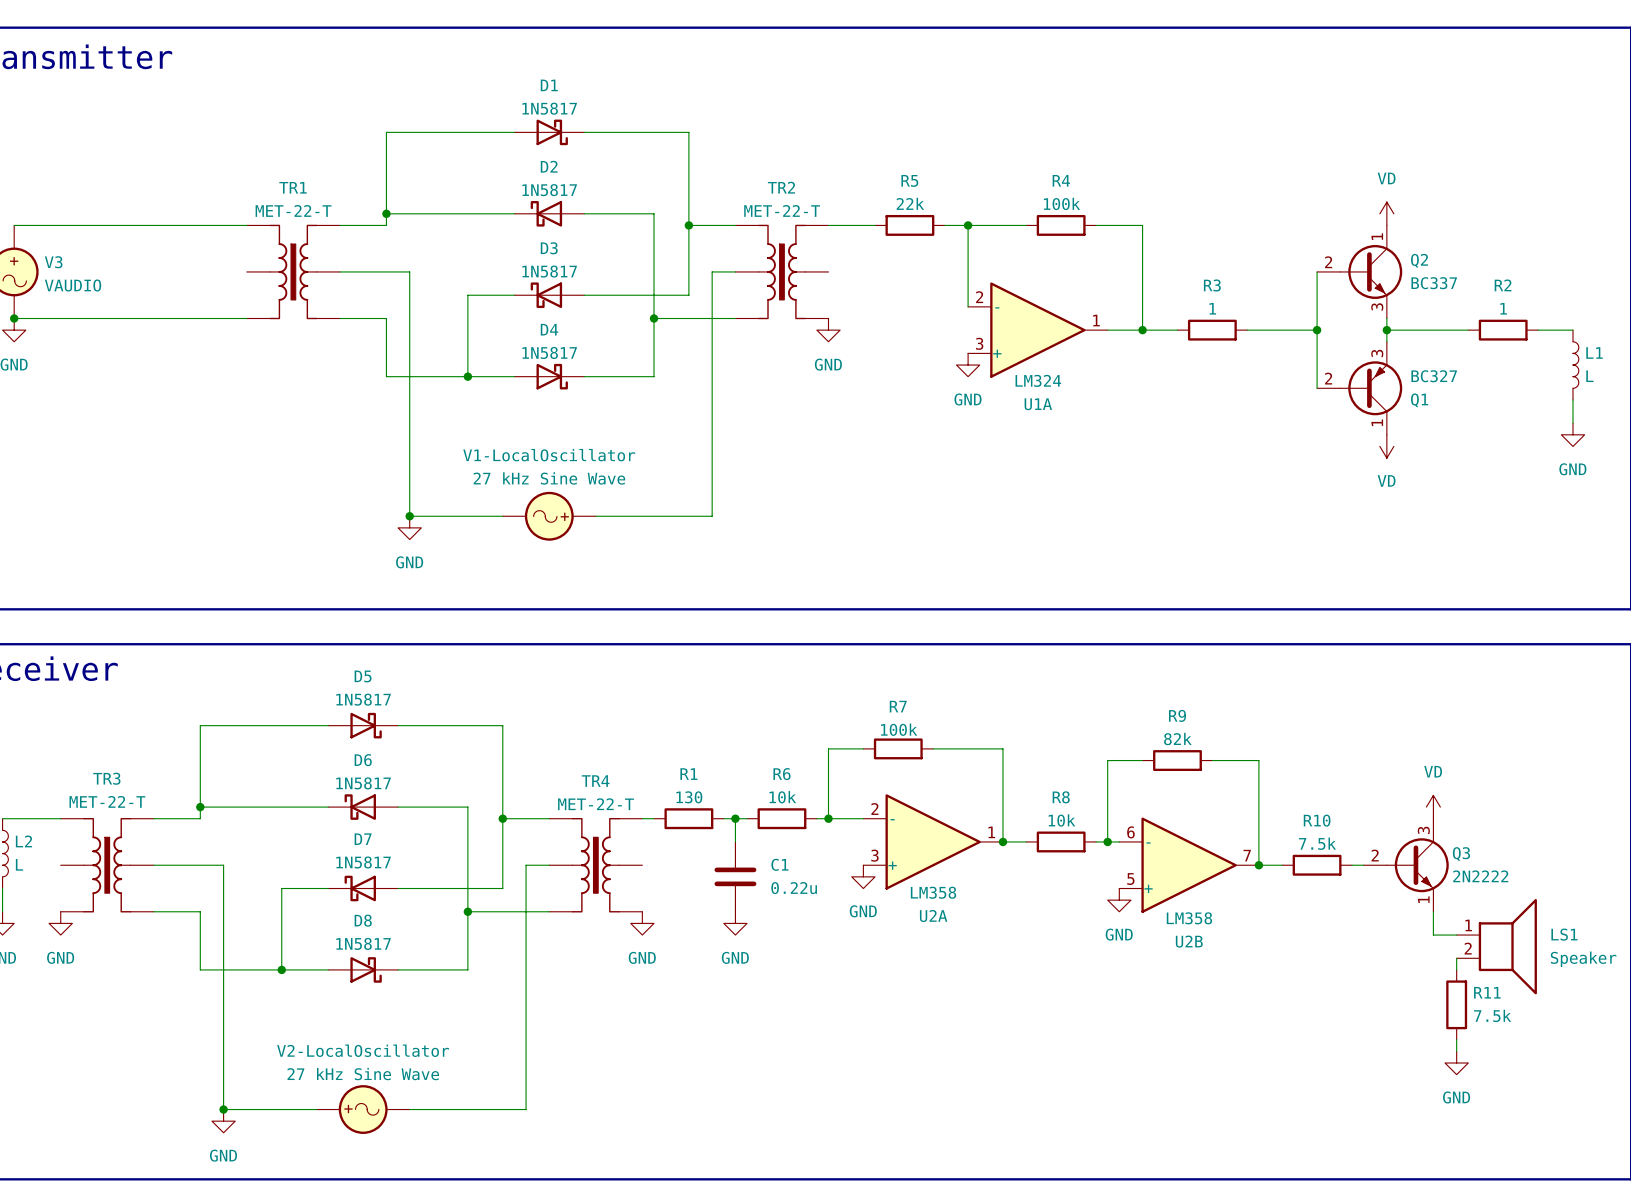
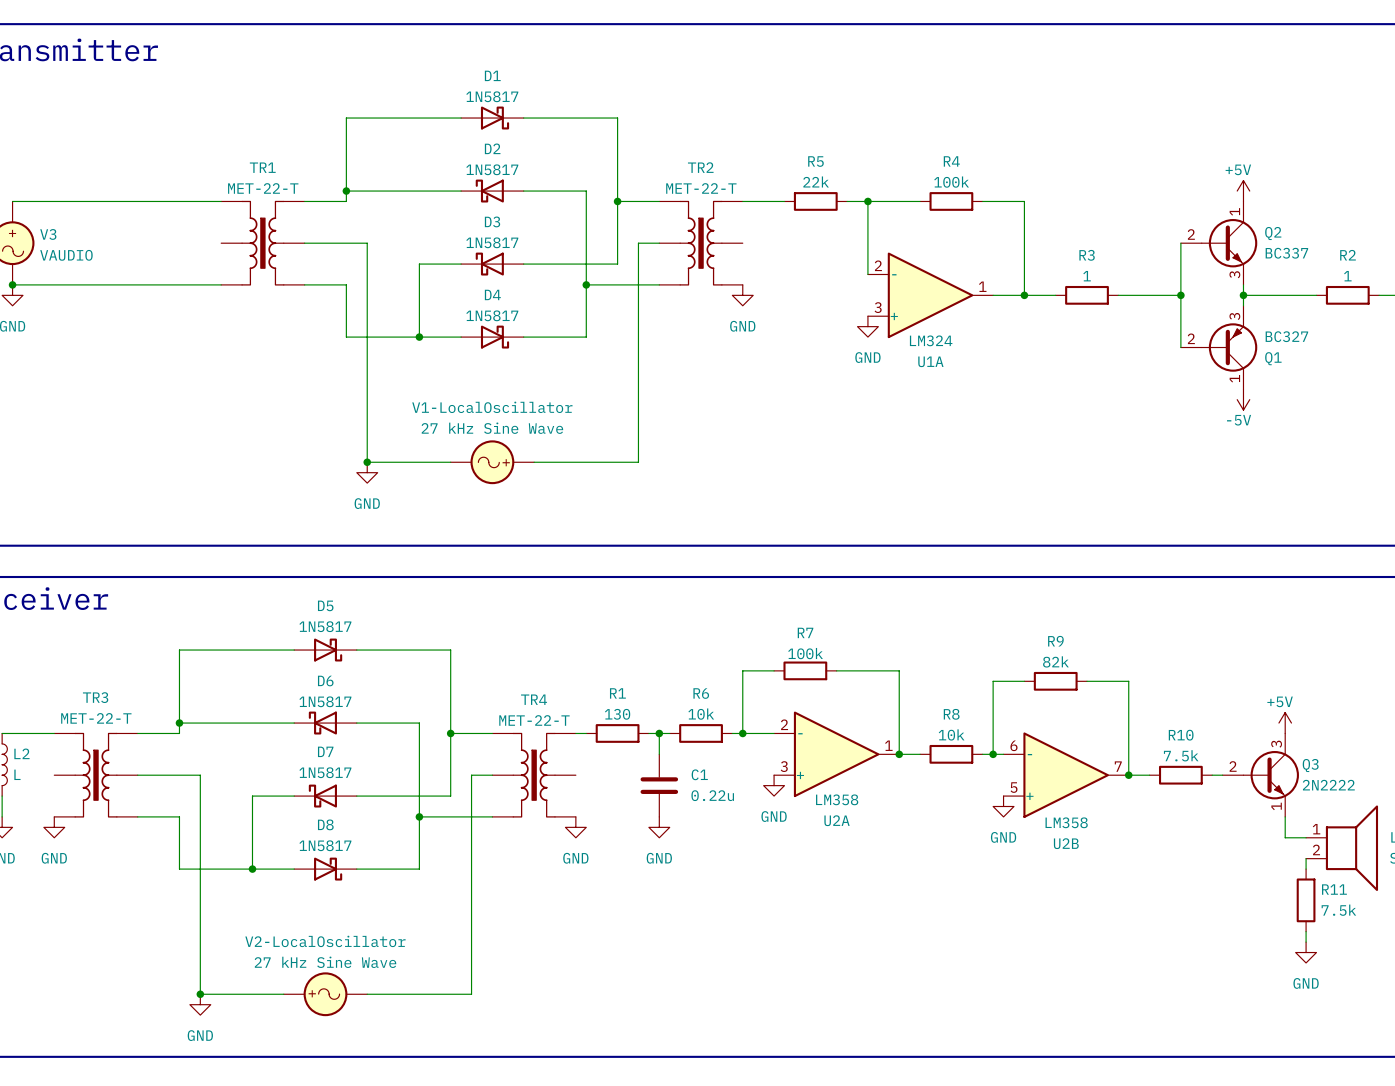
power symbol: VD (1386, 213) -> +5V (1243, 191)
power symbol: VD (1386, 446) -> -5V (1243, 399)
power symbol: VD (1433, 807) -> +5V (1285, 723)

